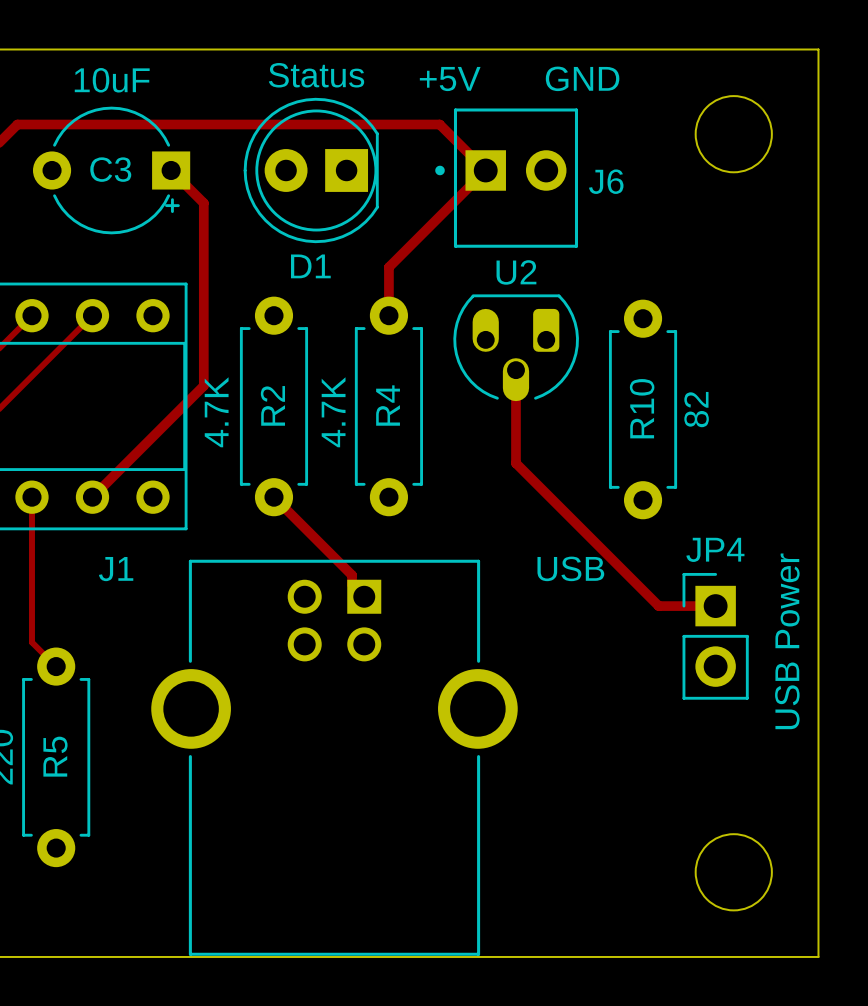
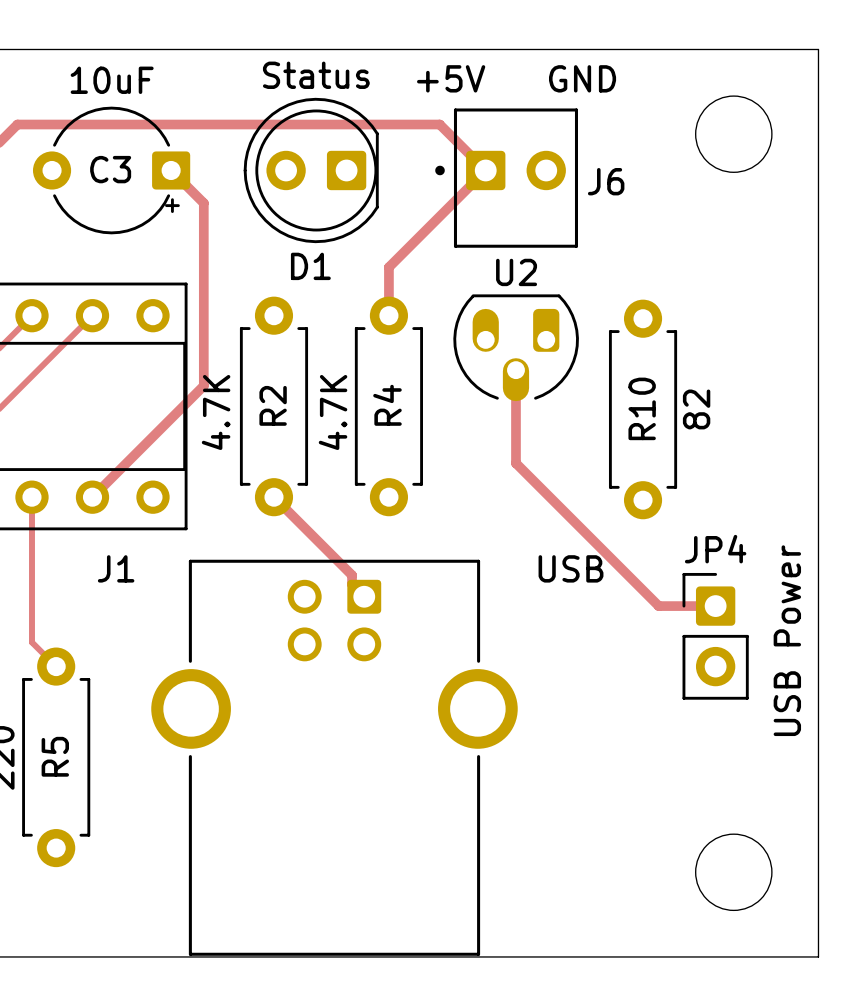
D1 footprint: [243, 97, 379, 244] -> [243, 97, 379, 244]
C3 footprint: [32, 106, 191, 235] -> [32, 106, 191, 235]
J6 footprint: [435, 108, 579, 248] -> [435, 108, 579, 248]
J1 footprint: [151, 559, 518, 956] -> [151, 559, 518, 956]
JP4 footprint: [682, 572, 749, 700] -> [682, 572, 749, 700]

